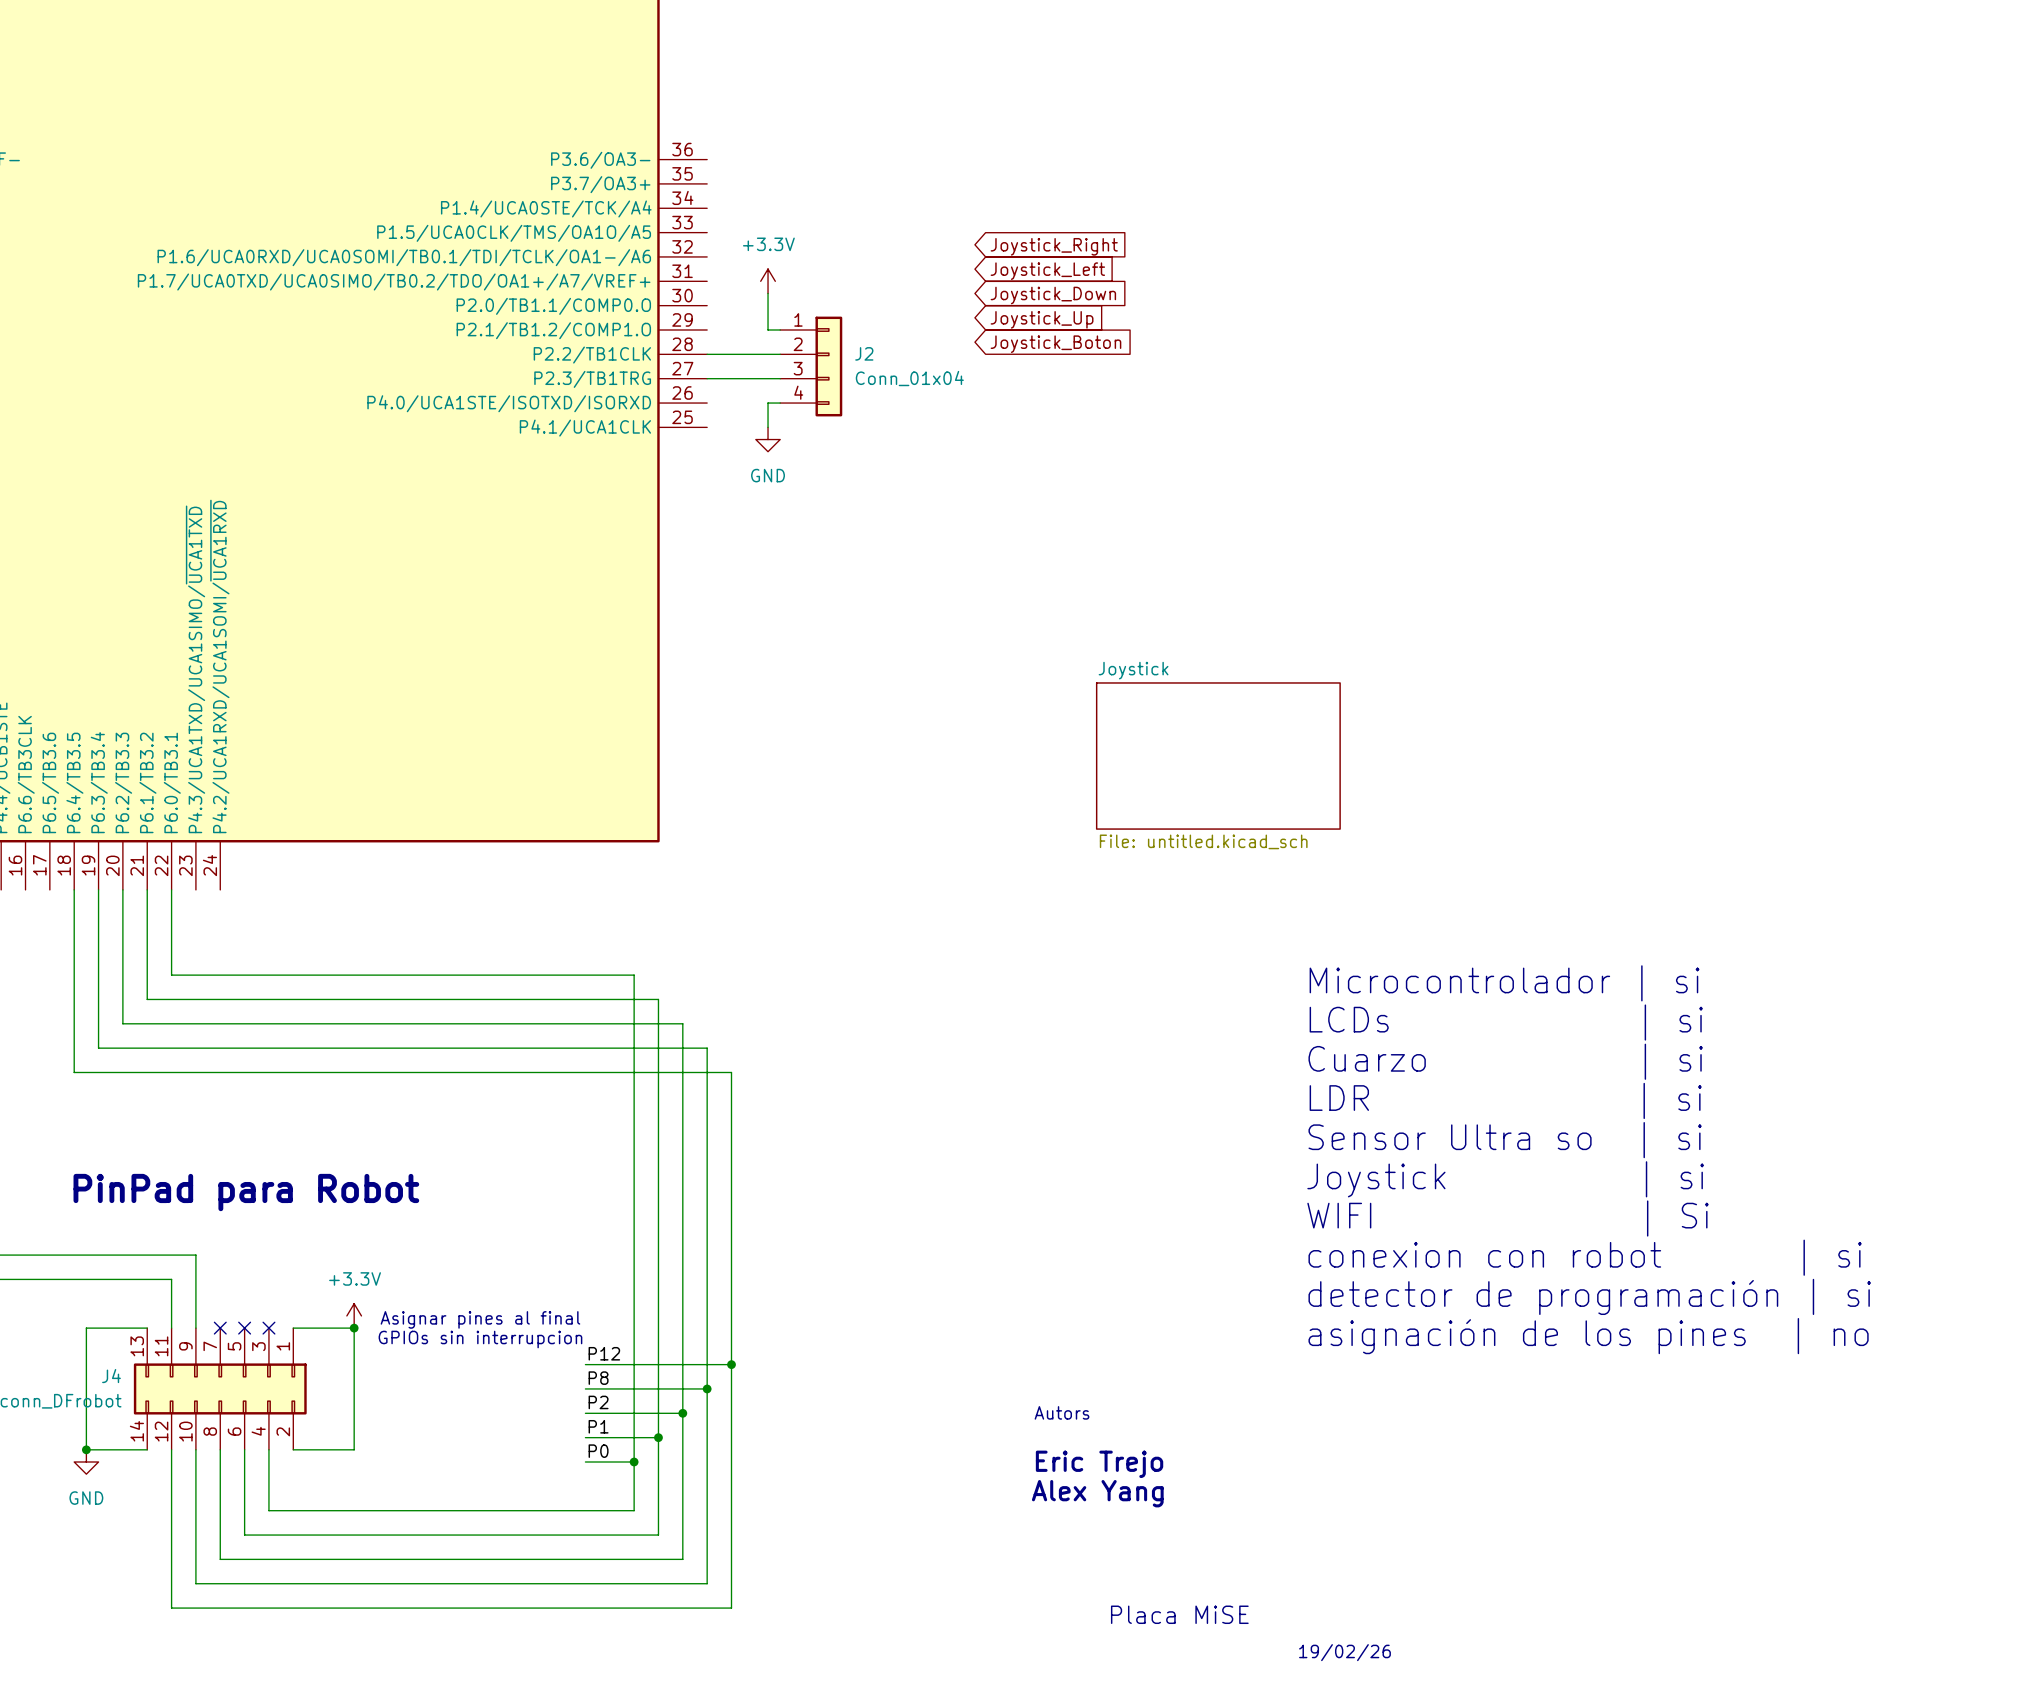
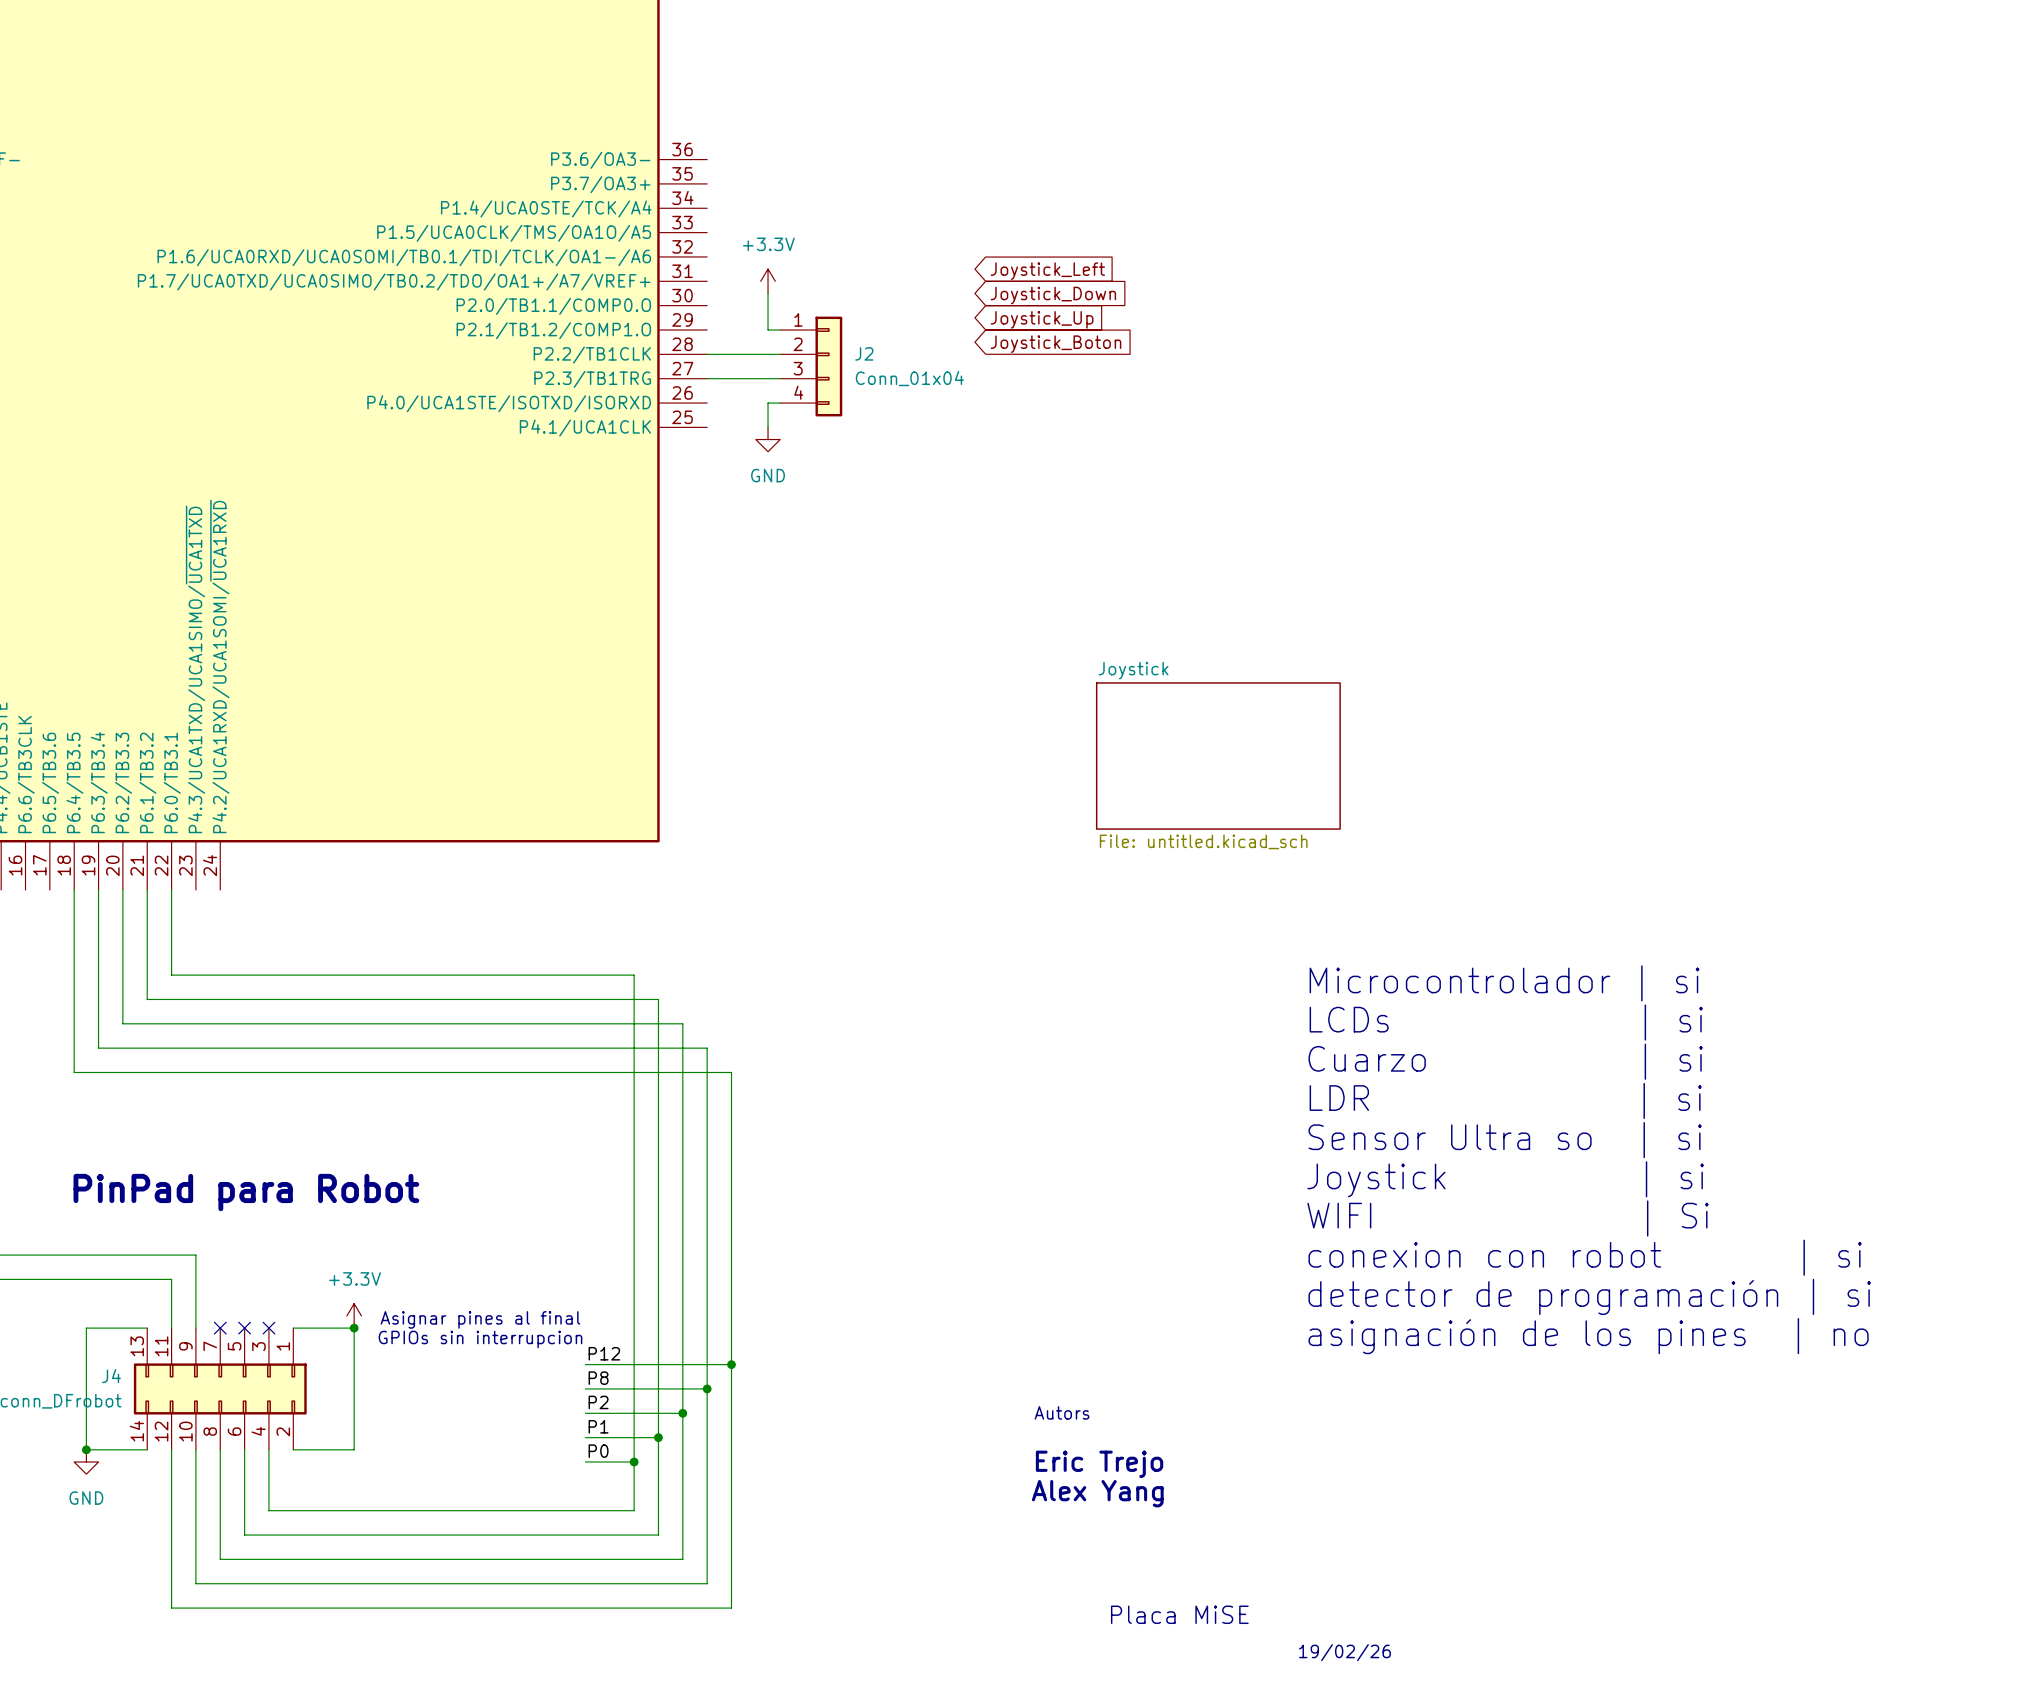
global label: Joystick_Right (1054, 246) -> none

